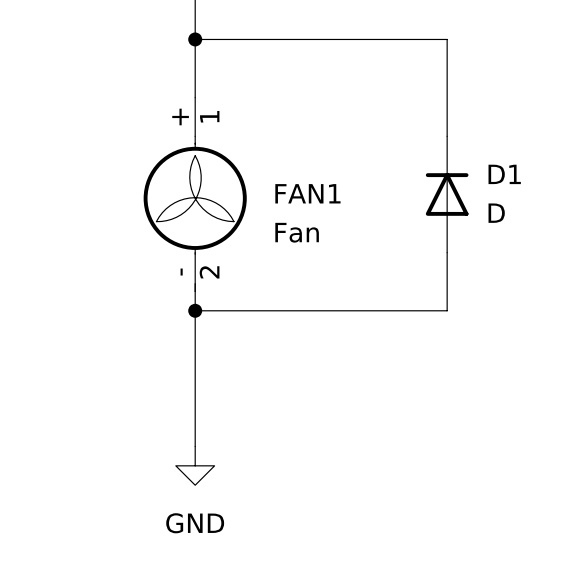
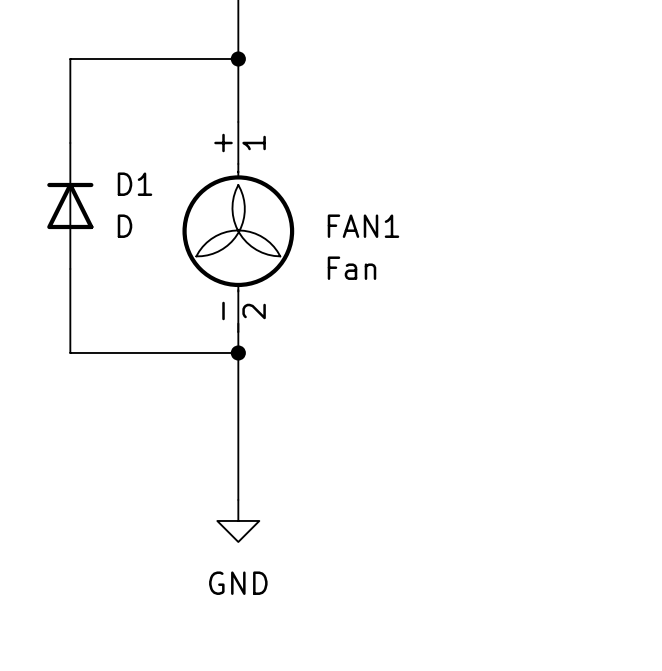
wire: (195, 39) (447, 39) (447, 136) -> (238, 59) (70, 59) (70, 142)
D1 position: (447, 194) -> (70, 205)
wire: (447, 252) (447, 310) (195, 310) -> (70, 268) (70, 352) (238, 352)

